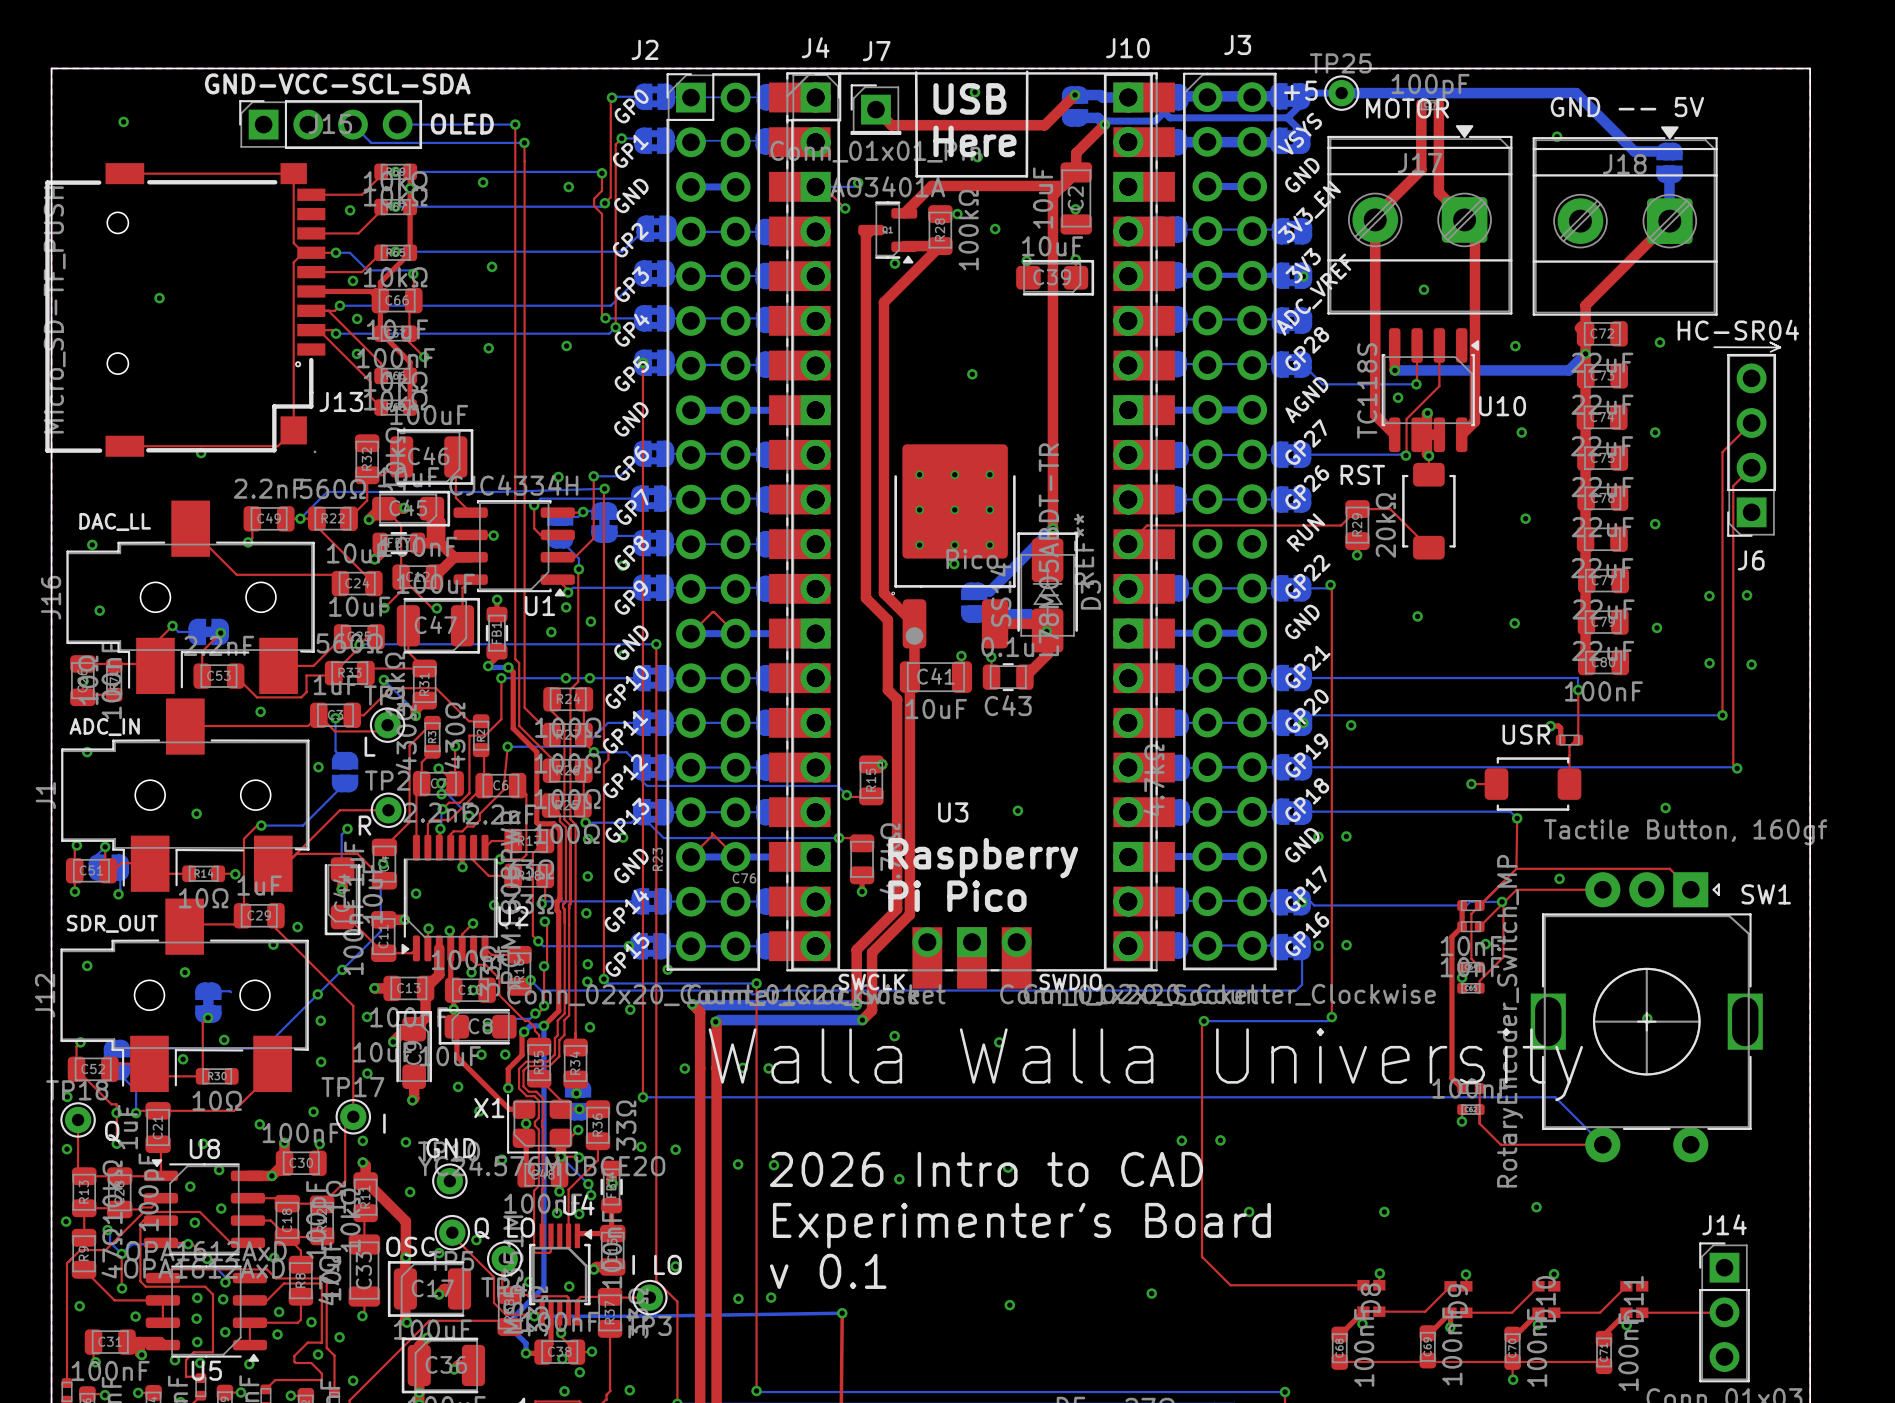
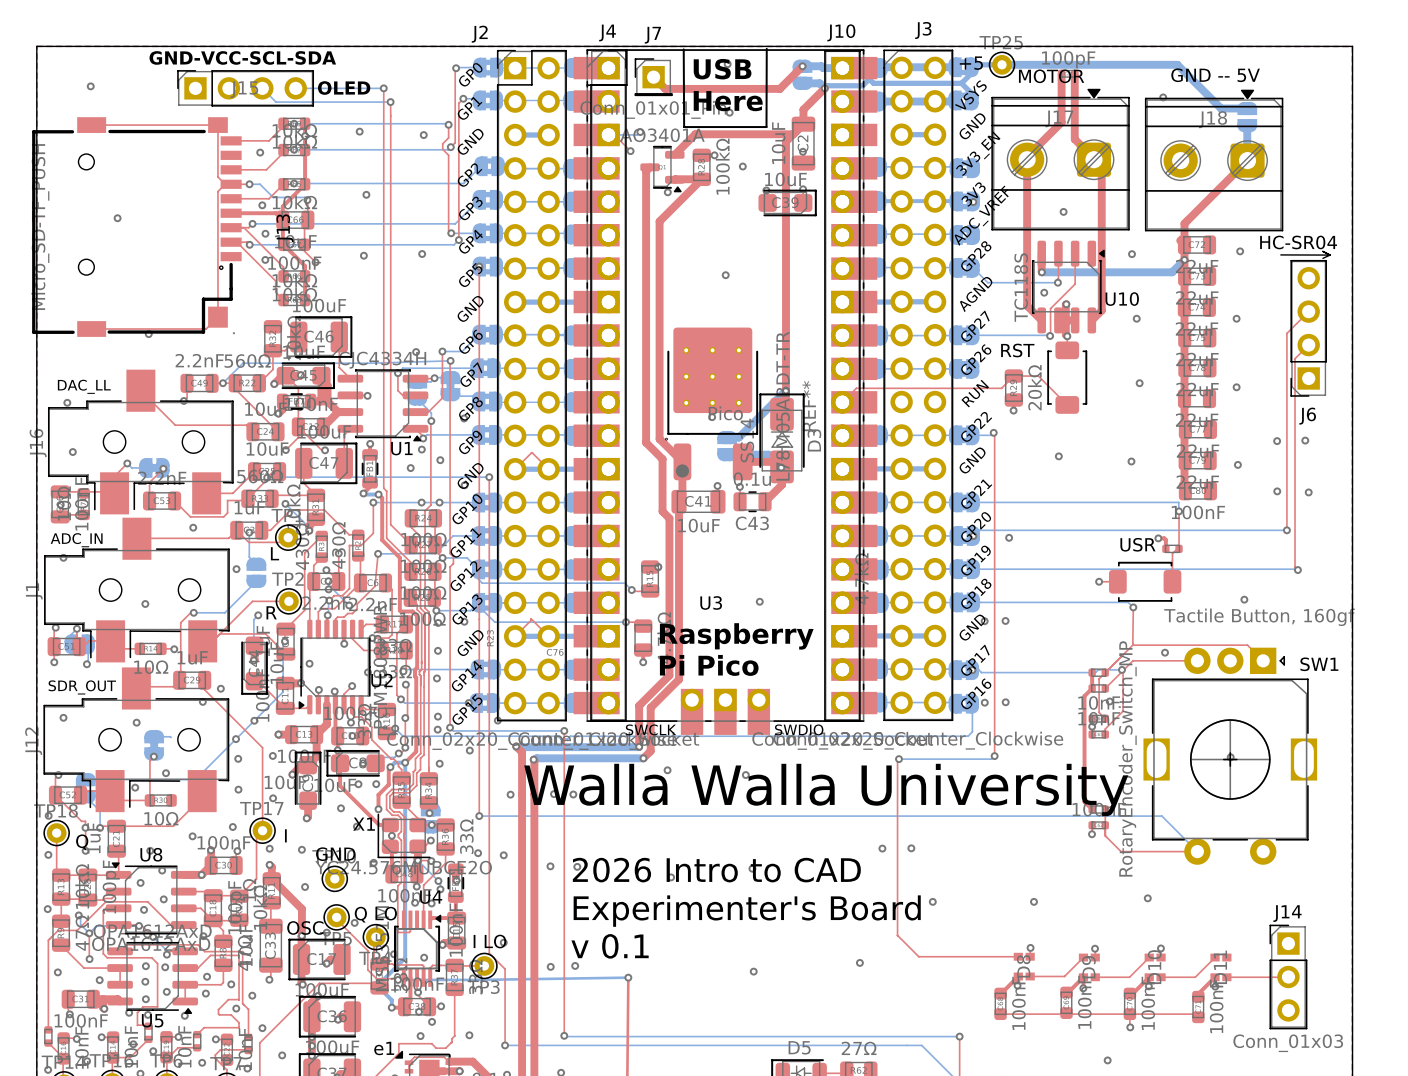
J13 name rotation: 0° (341, 401) -> 90° counterclockwise (284, 228)
J13 name position: J13 (341, 401) -> J13 (284, 228)

